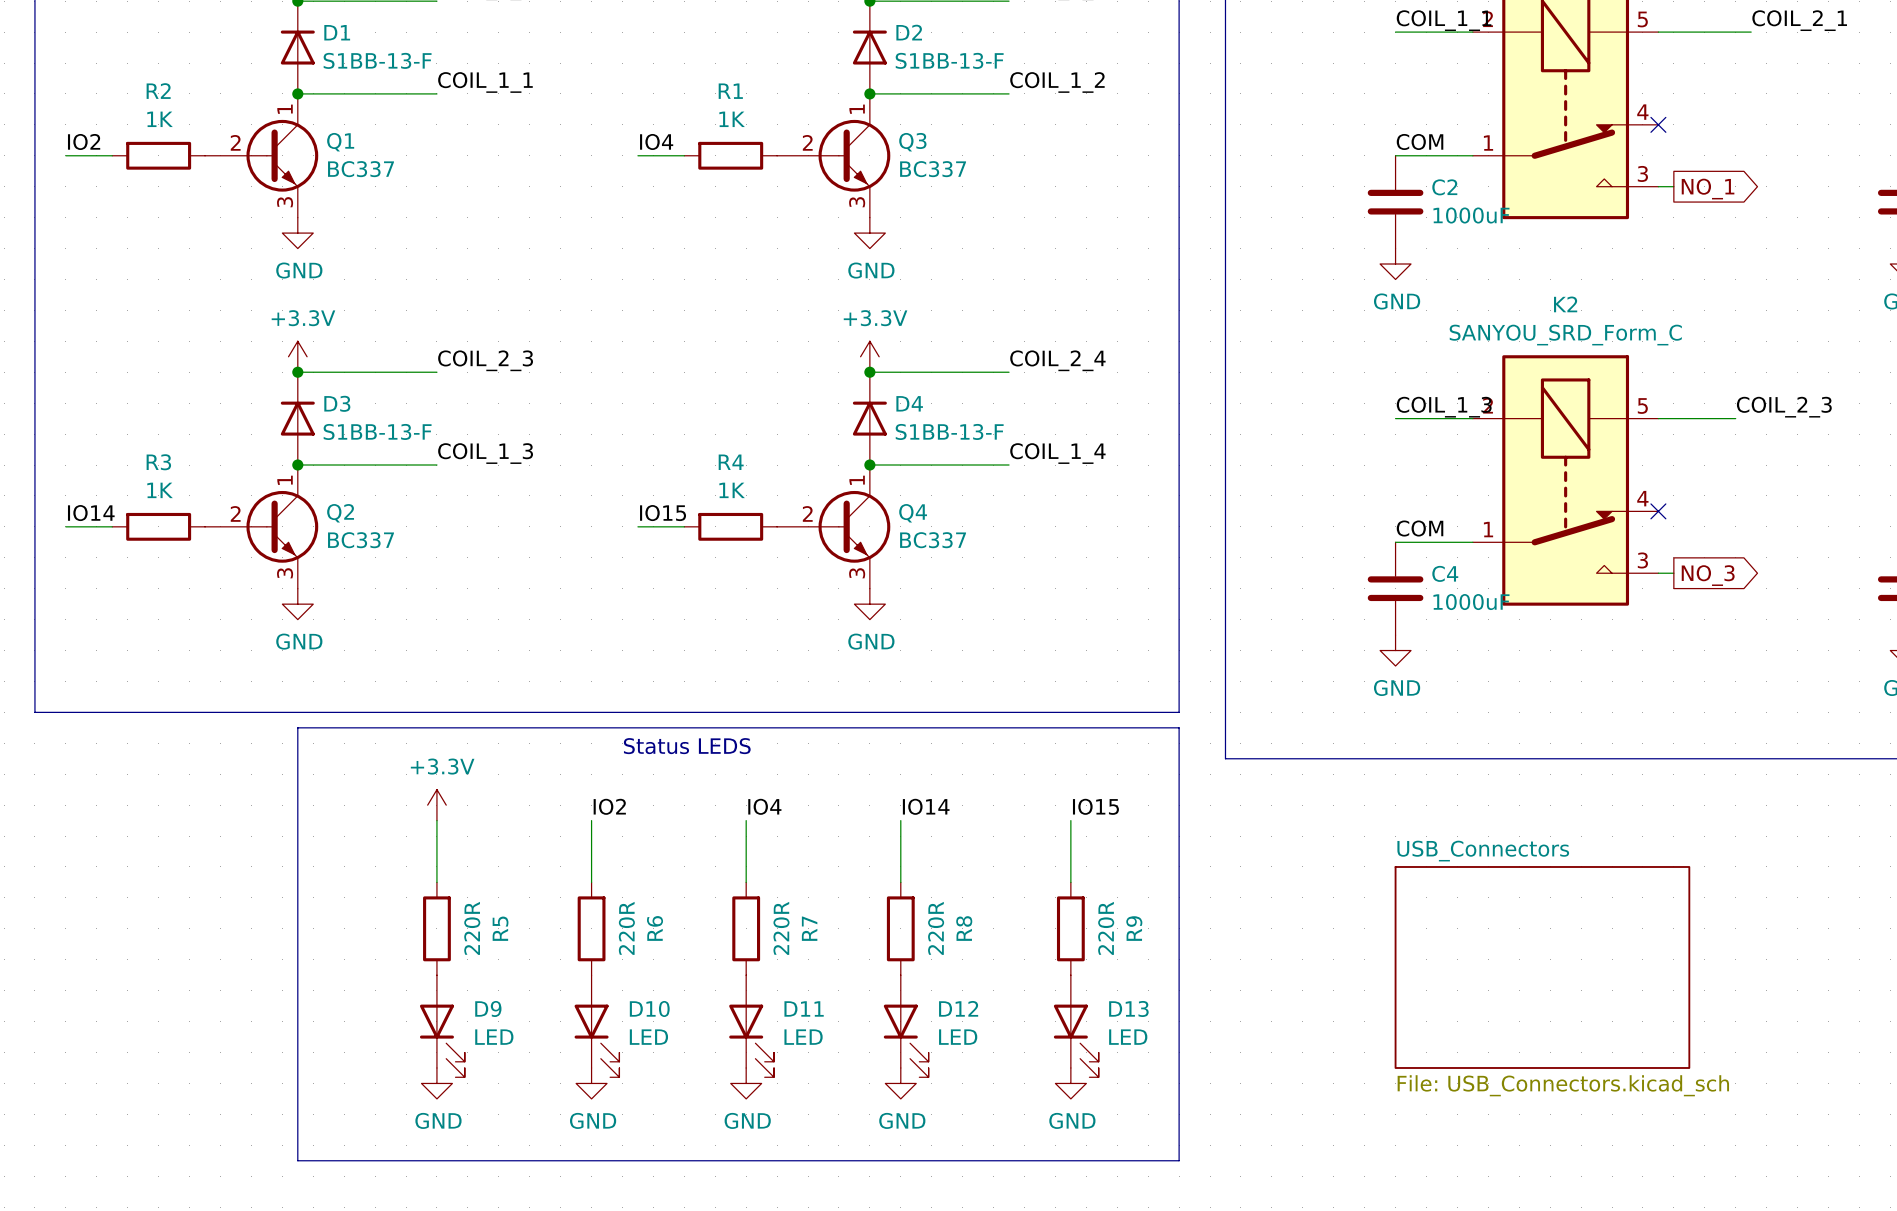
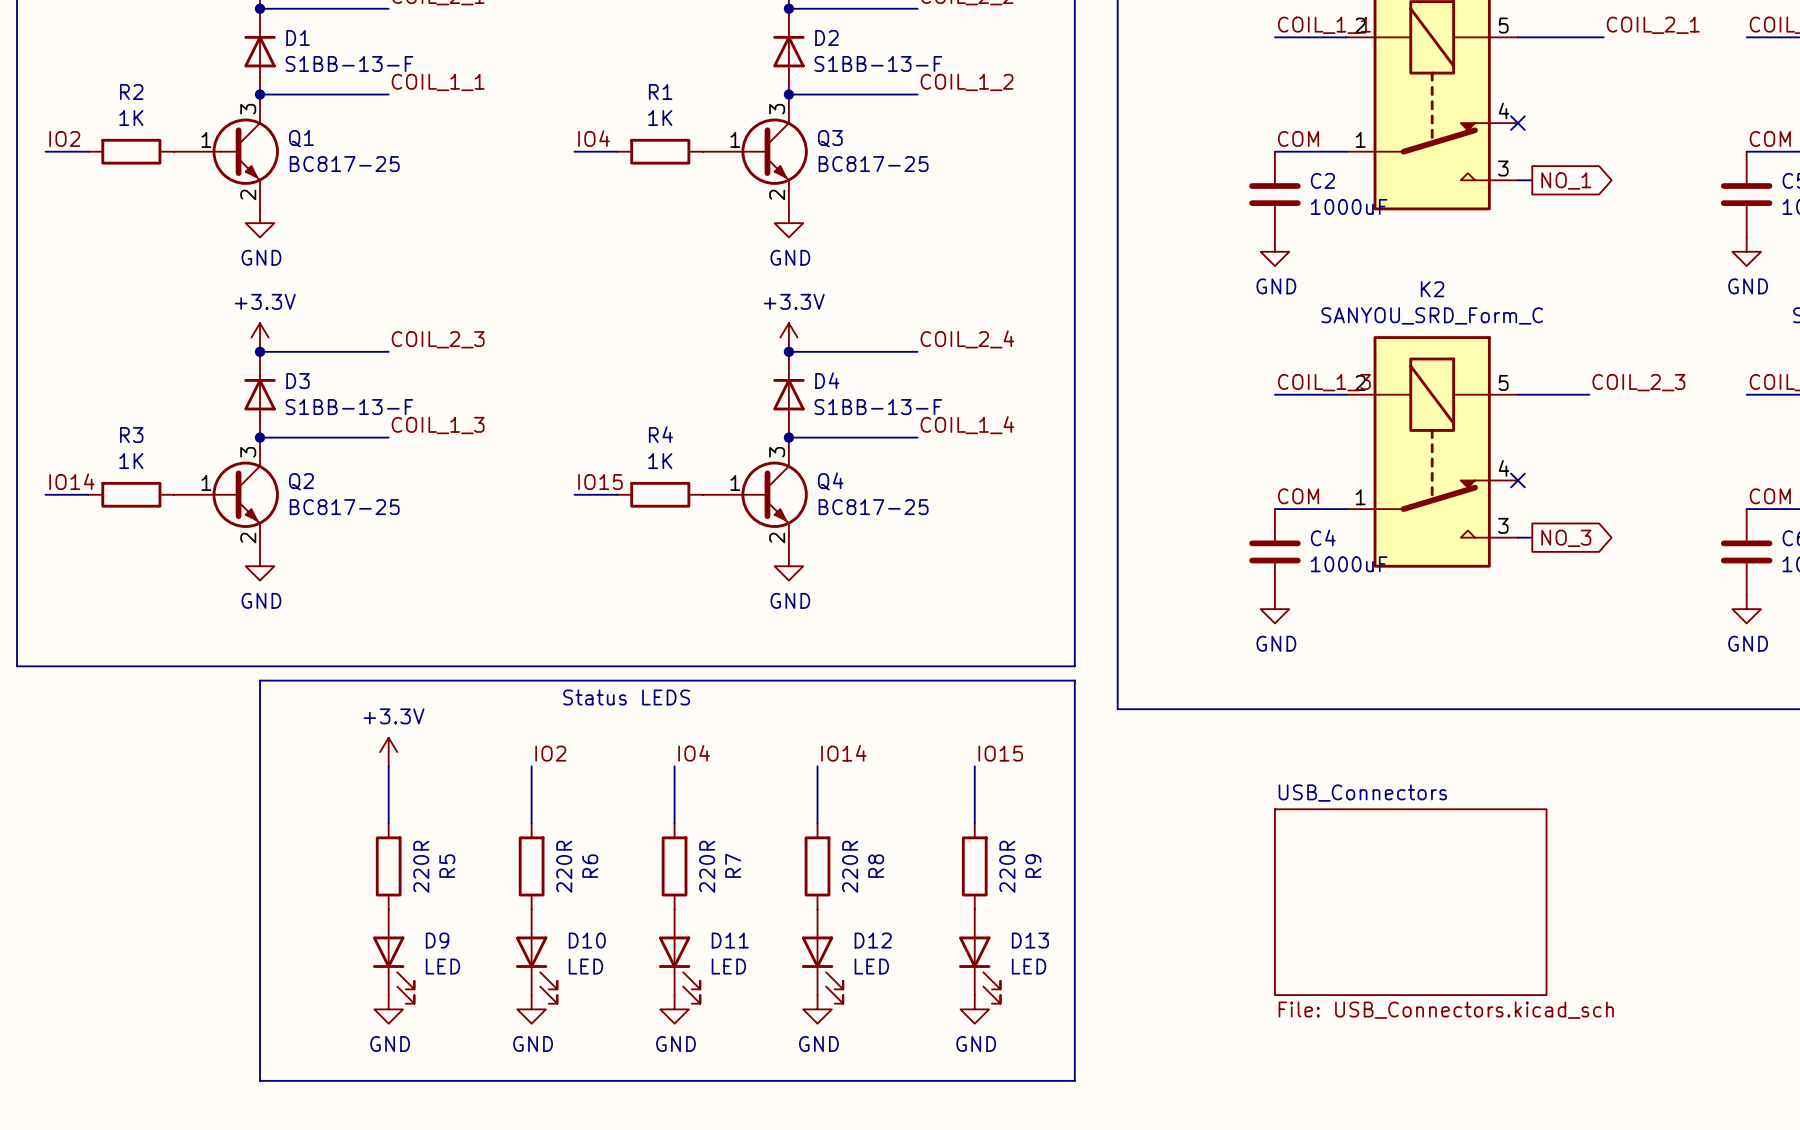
Q1 symbol: [205, 93, 319, 218] -> [174, 94, 279, 209]
Q3 symbol: [777, 93, 891, 218] -> [703, 94, 808, 209]
Q1 value: BC337 (361, 169) -> BC817-25 (344, 164)
Q3 value: BC337 (933, 169) -> BC817-25 (873, 164)
Q2 symbol: [205, 465, 319, 589] -> [174, 437, 279, 552]
Q4 symbol: [777, 465, 891, 589] -> [703, 437, 808, 552]
Q2 value: BC337 (361, 540) -> BC817-25 (344, 507)
Q4 value: BC337 (933, 540) -> BC817-25 (873, 507)

